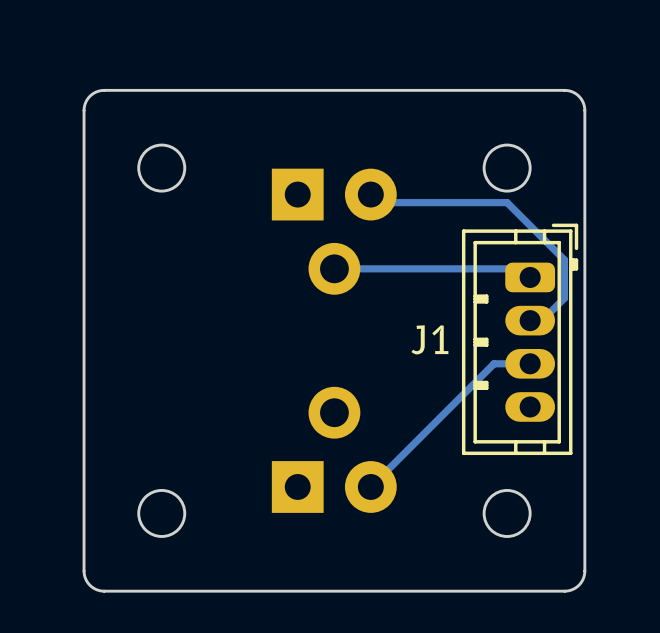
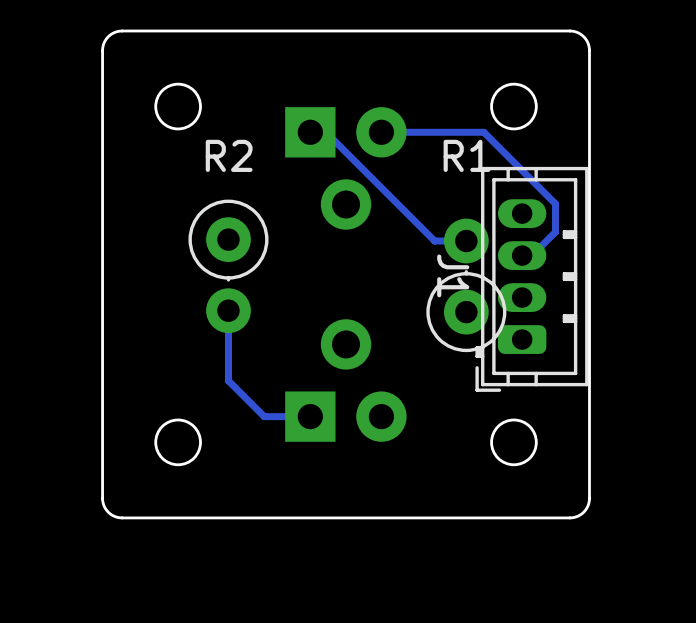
track: none -> (325, 132) (434, 241) (466, 241)
track: none -> (381, 132) (483, 132) (555, 203) (555, 232) (531, 255) (522, 255)
track: (378, 202) (507, 202) (564, 259) (564, 298) (542, 320) (530, 320) -> none
track: (334, 268) (521, 268) (530, 277) -> none
R2: none -> (228, 266)
J1 rotation: 0° (520, 339) -> 180° (531, 279)
R1: none -> (466, 285)
track: (547, 363) (494, 363) (370, 486) -> none
track: none -> (228, 310) (228, 380) (264, 416) (310, 416)

